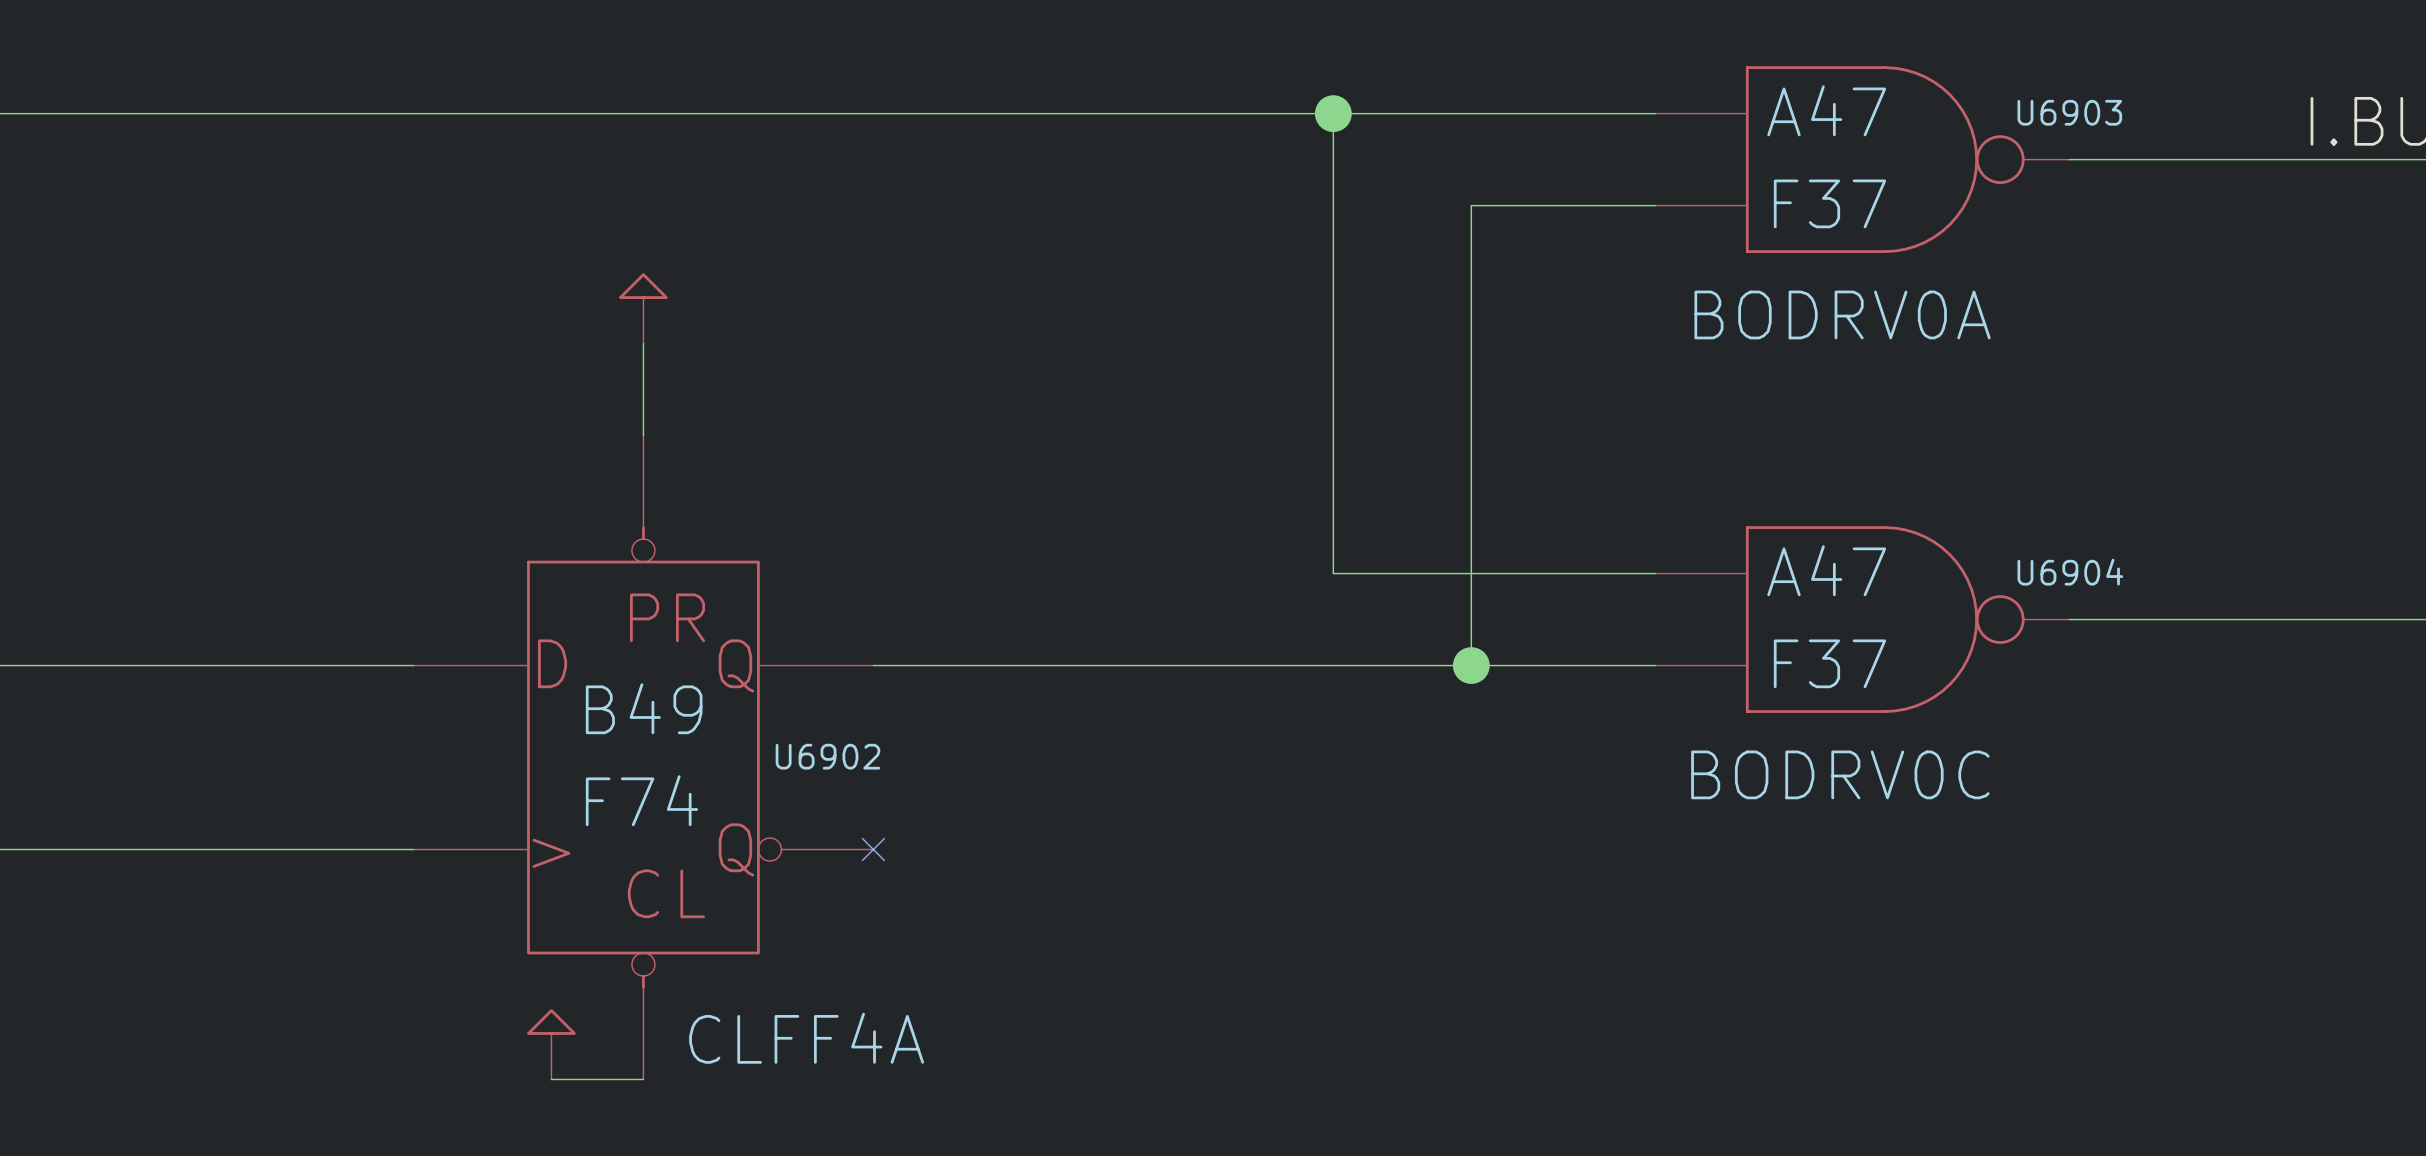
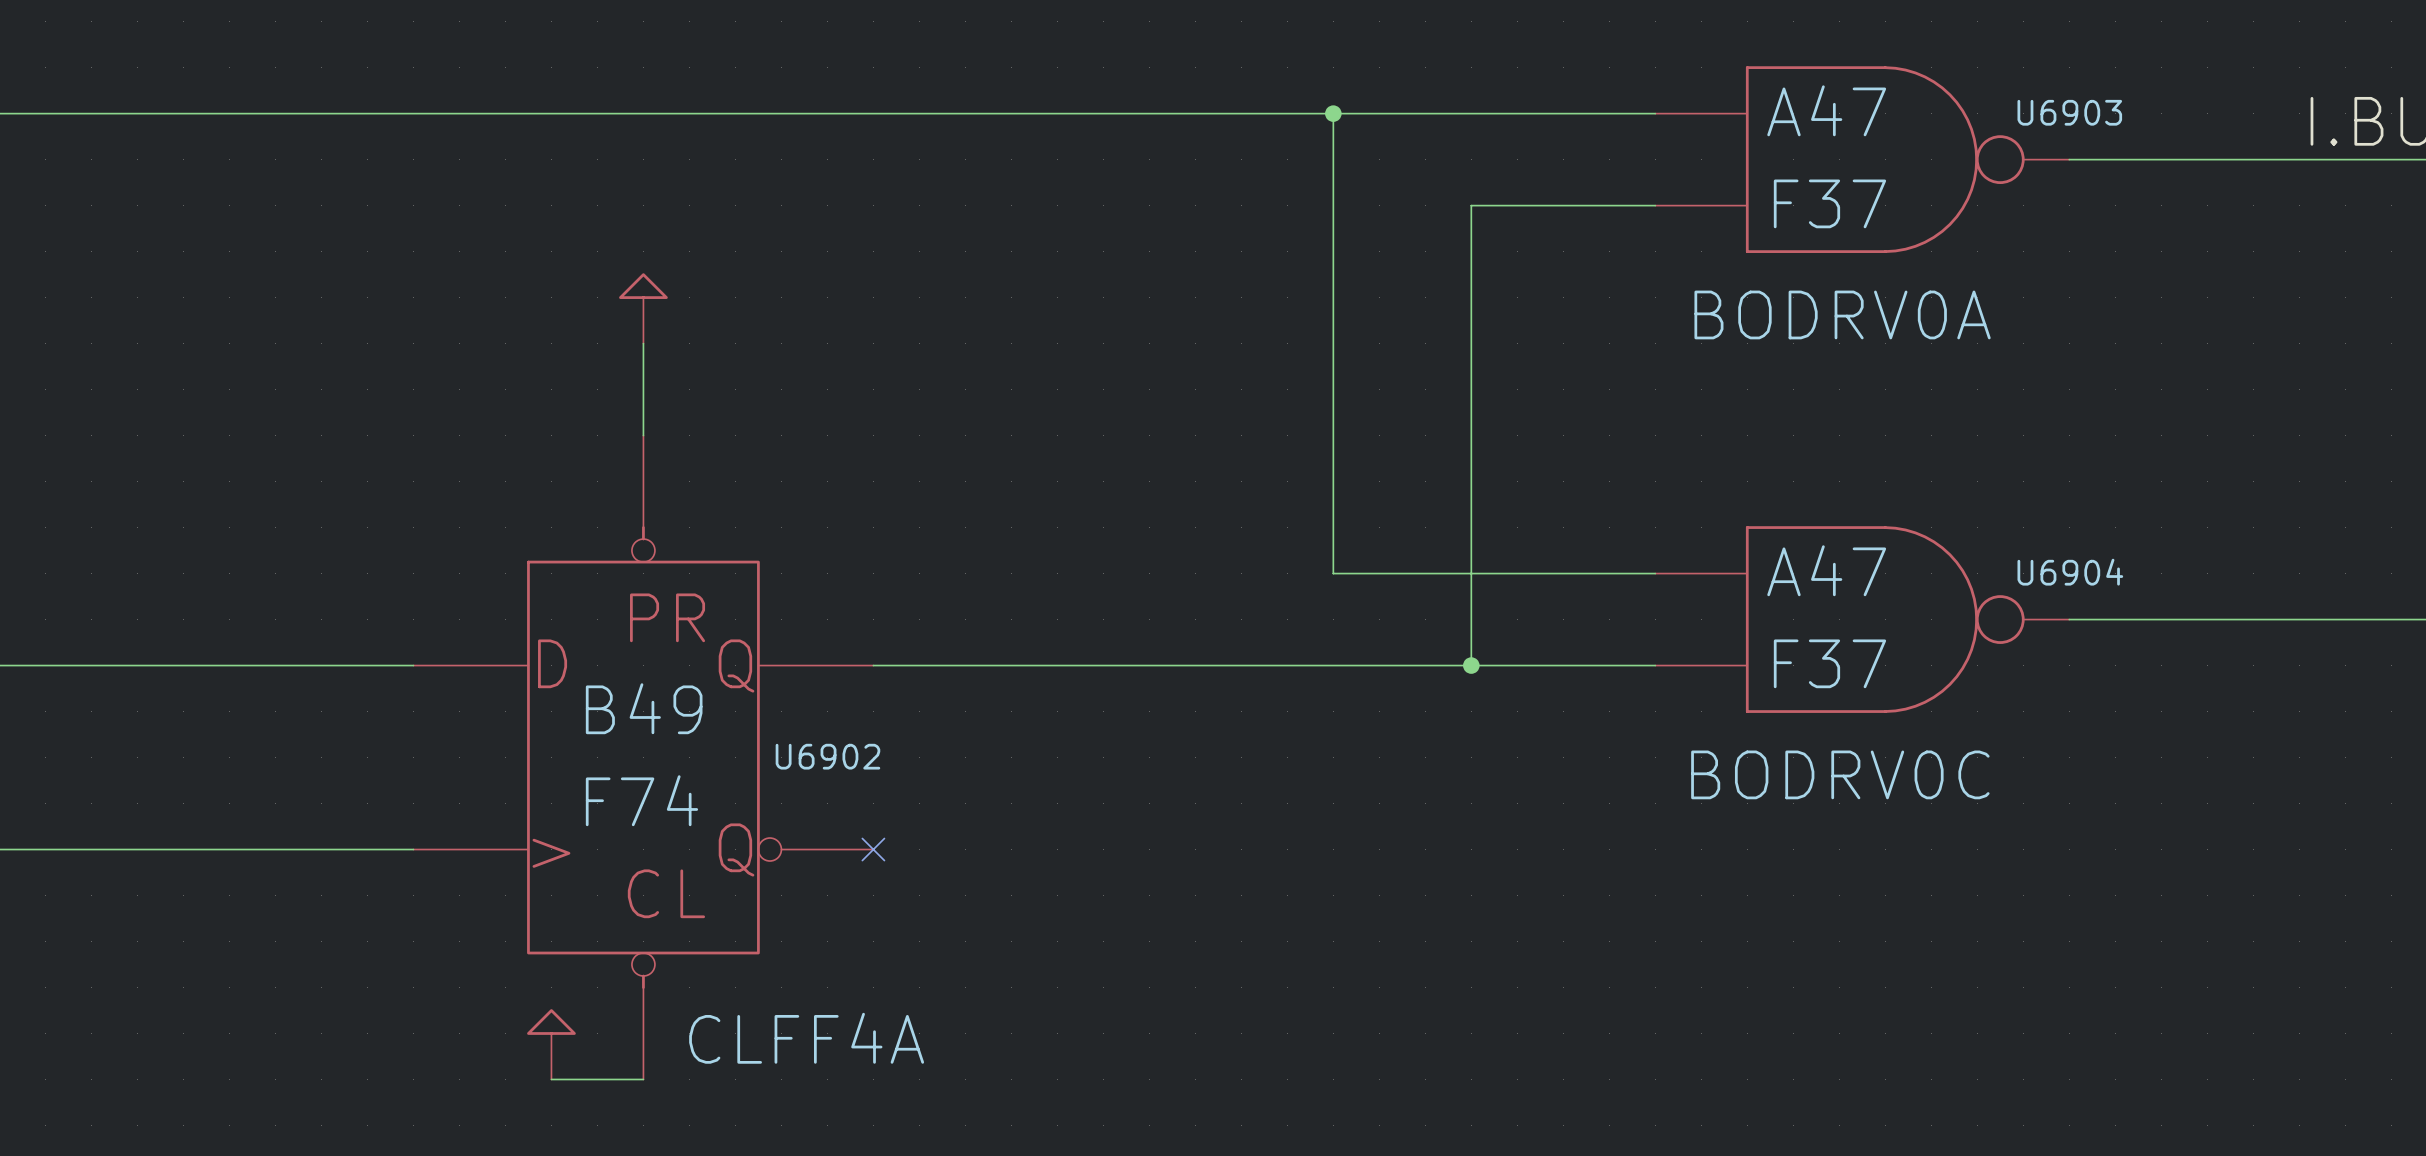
junction size: [1314, 95, 1352, 133] -> [1325, 105, 1342, 122]
junction size: [1452, 647, 1490, 684] -> [1463, 657, 1480, 674]

